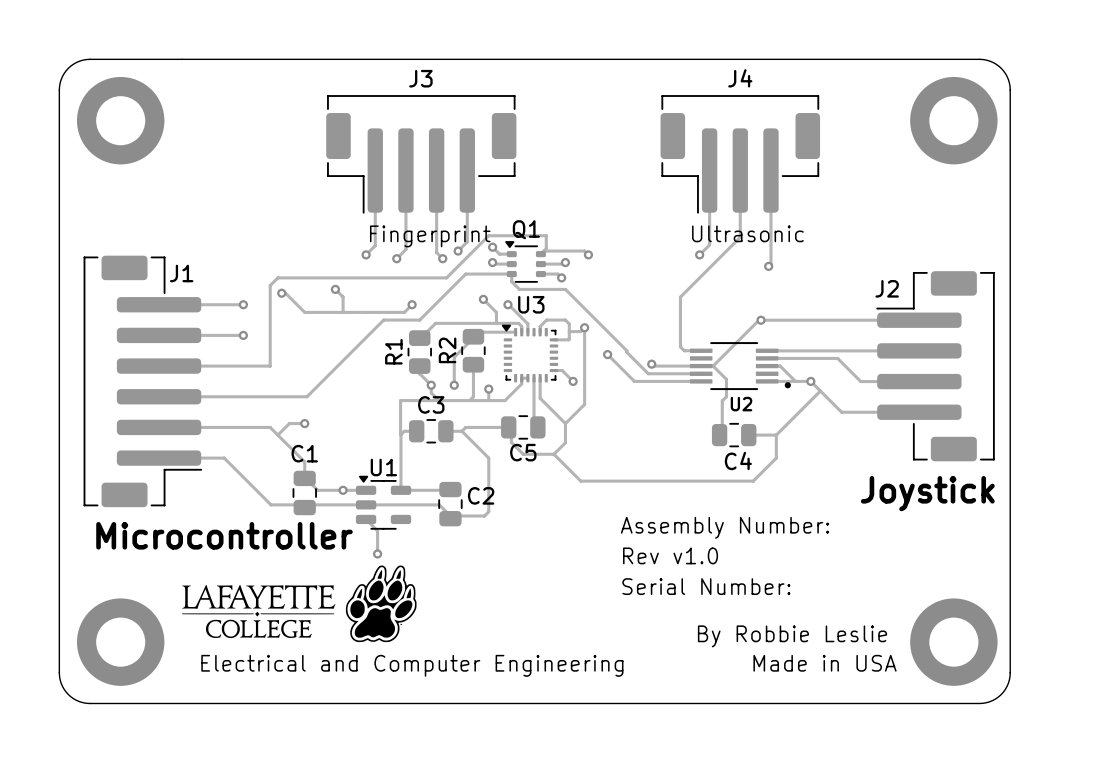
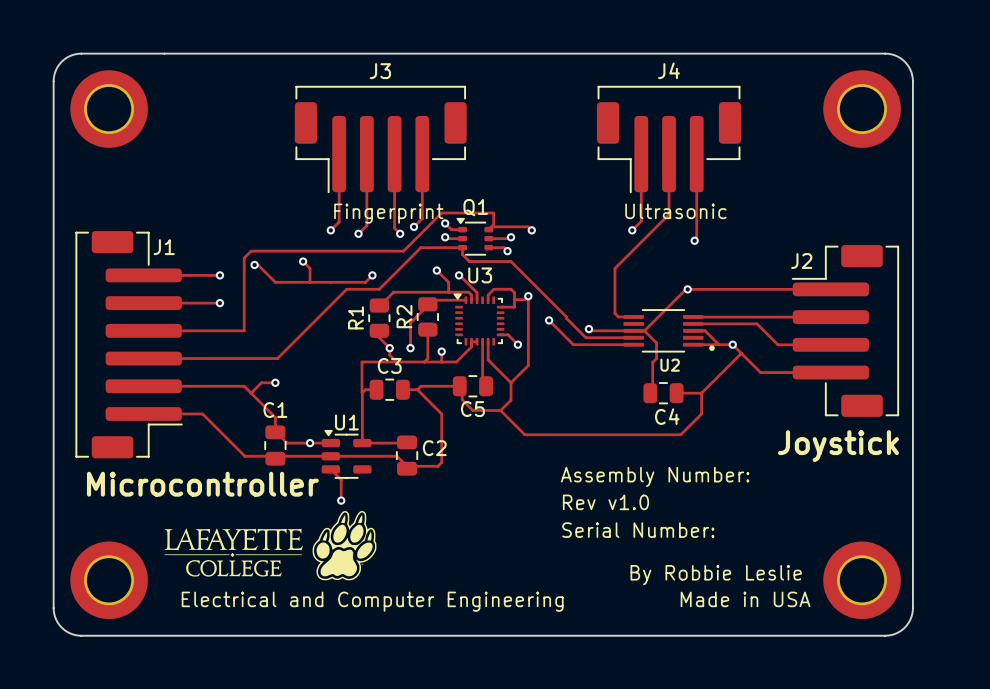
part footprint: [76, 76, 165, 165] -> [70, 70, 148, 148]
part footprint: [910, 76, 998, 165] -> [823, 70, 901, 148]
part footprint: [76, 598, 165, 686] -> [70, 541, 148, 620]
part footprint: [910, 598, 998, 686] -> [823, 541, 901, 620]

